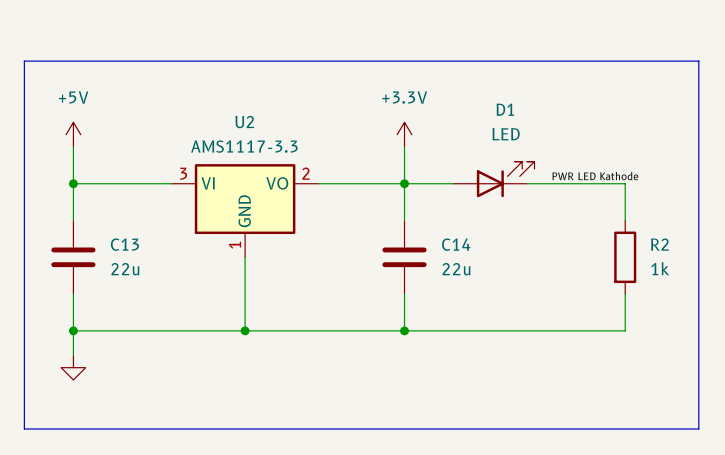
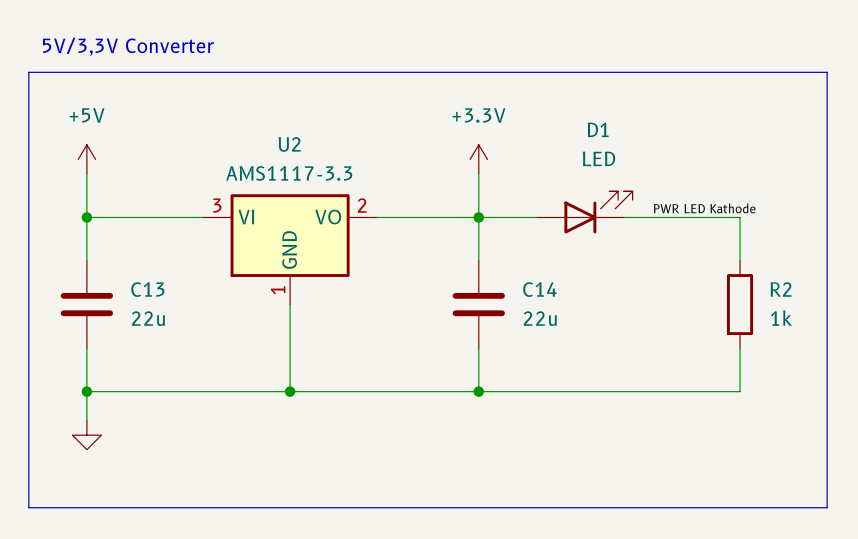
text: none -> 5V/3,3V Converter (128, 46)

